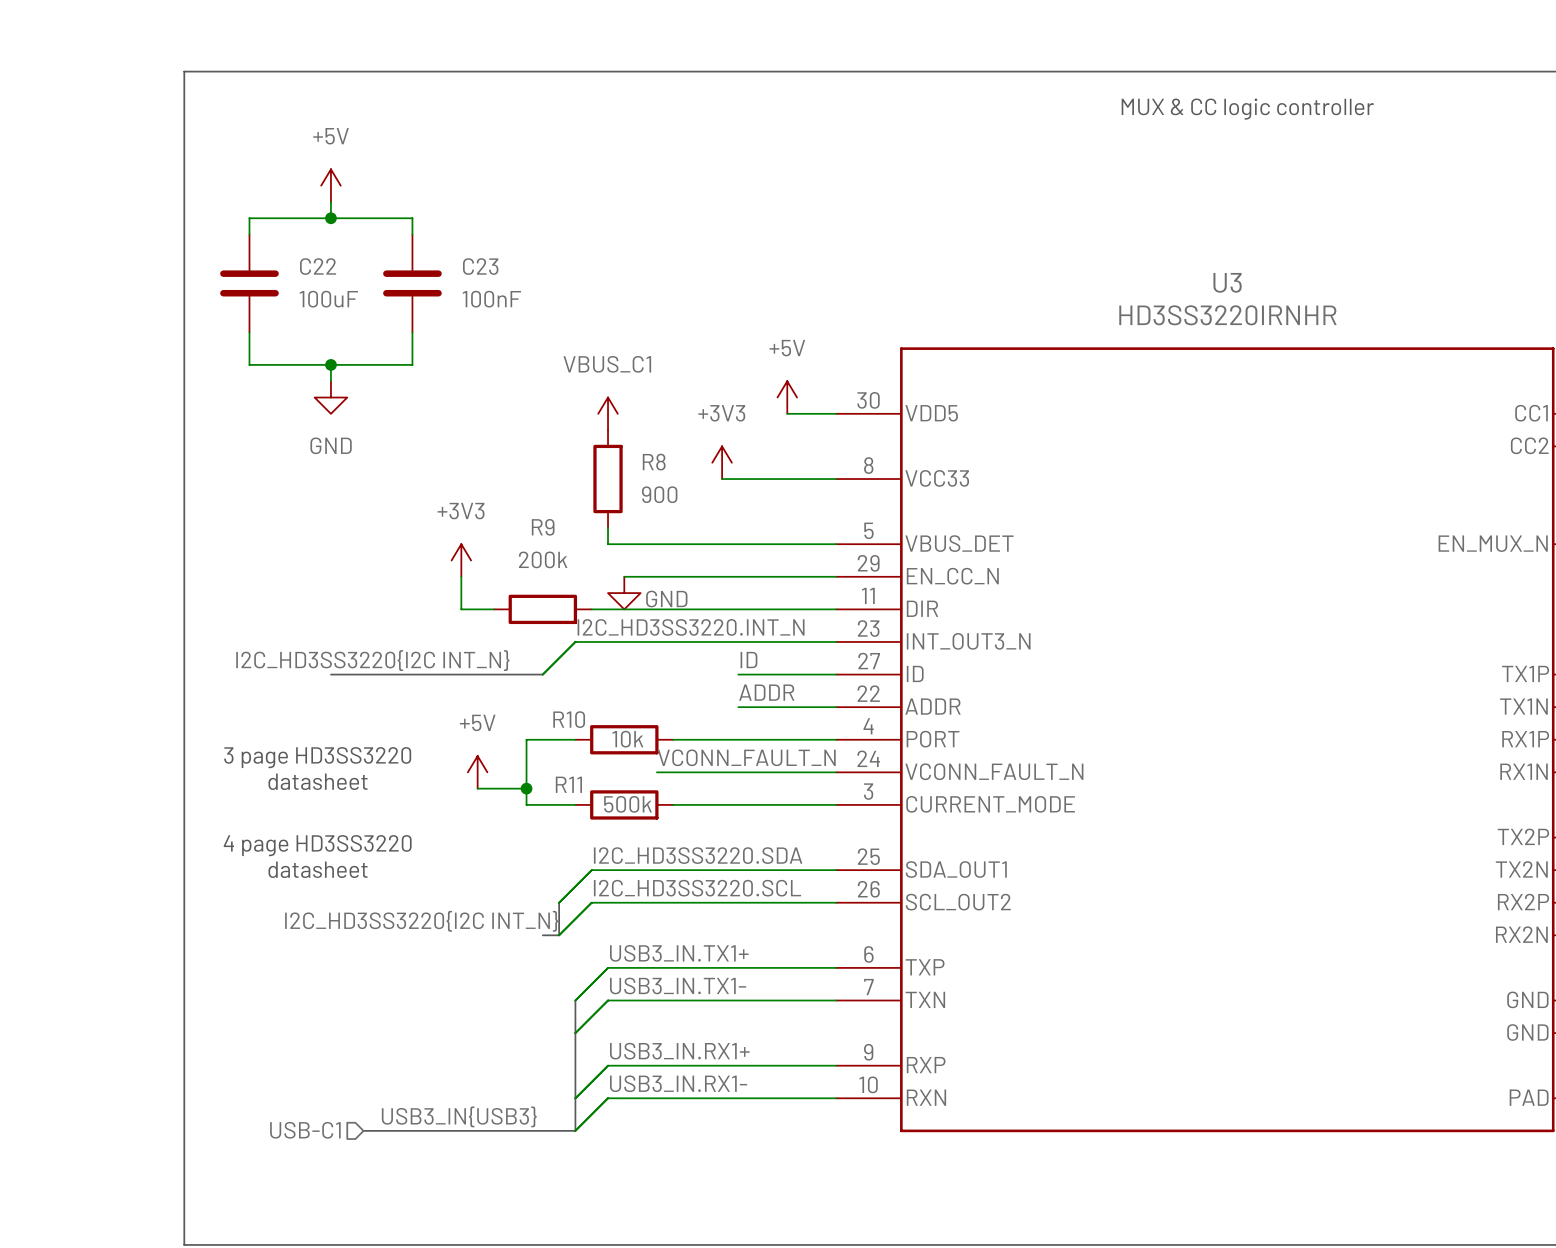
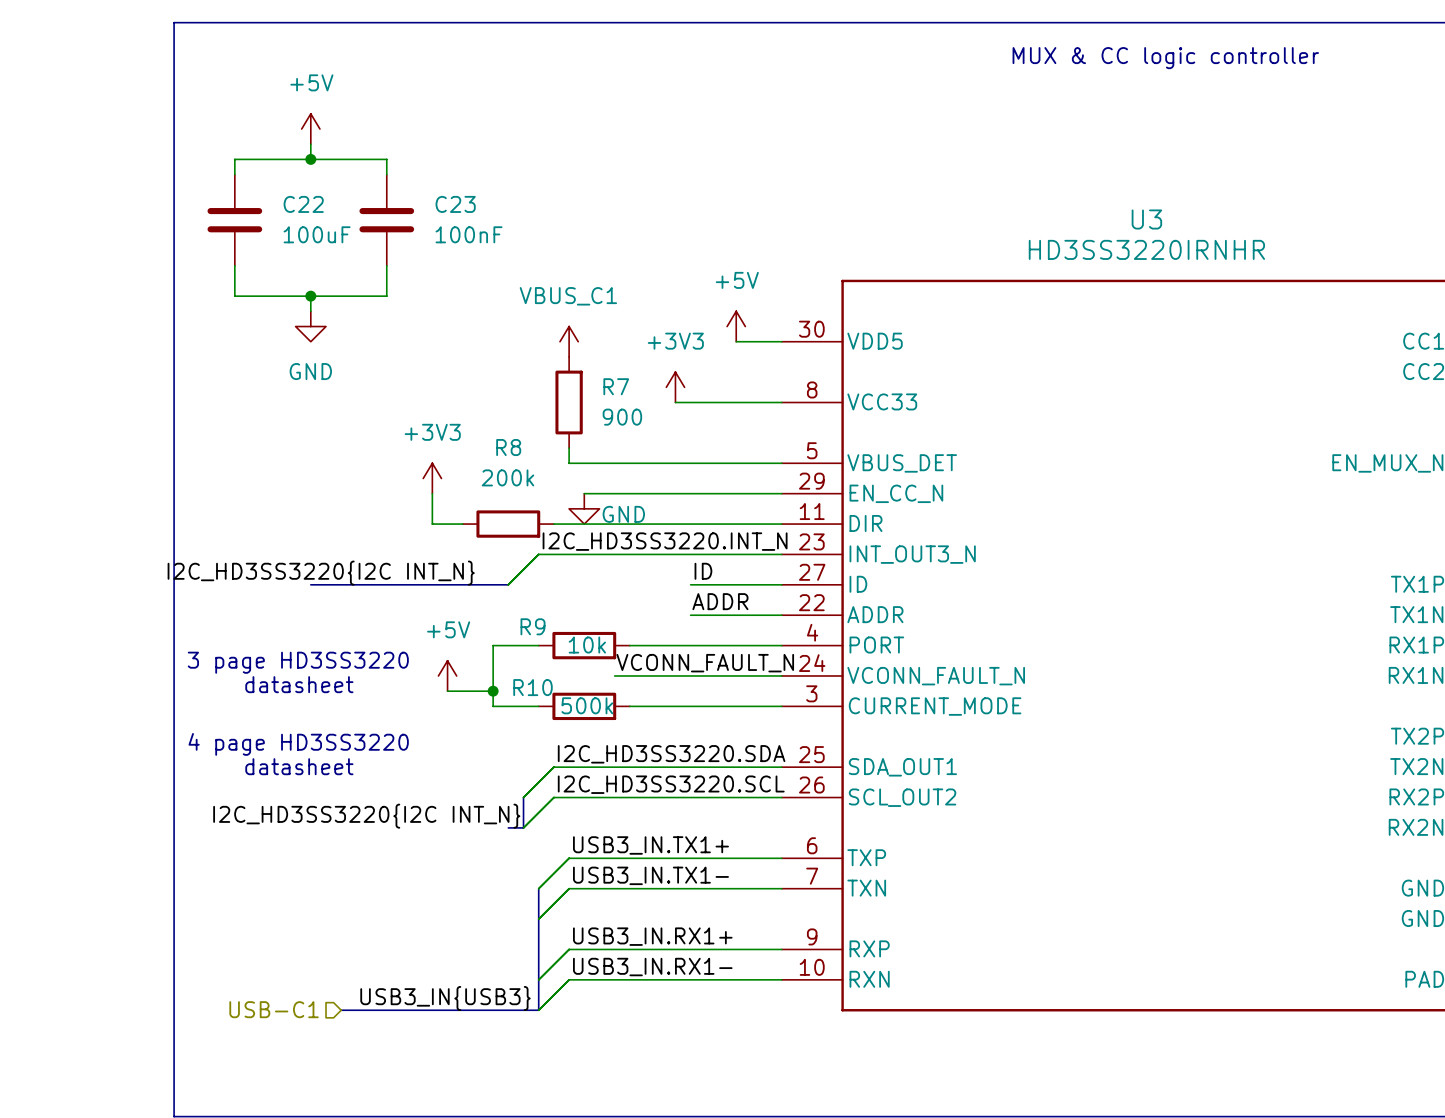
R8 name: R8 (654, 462) -> R7 (616, 386)
R9 name: R9 (543, 527) -> R8 (508, 447)
R10 name: R10 (569, 719) -> R9 (533, 626)
R11 name: R11 (568, 784) -> R10 (533, 687)

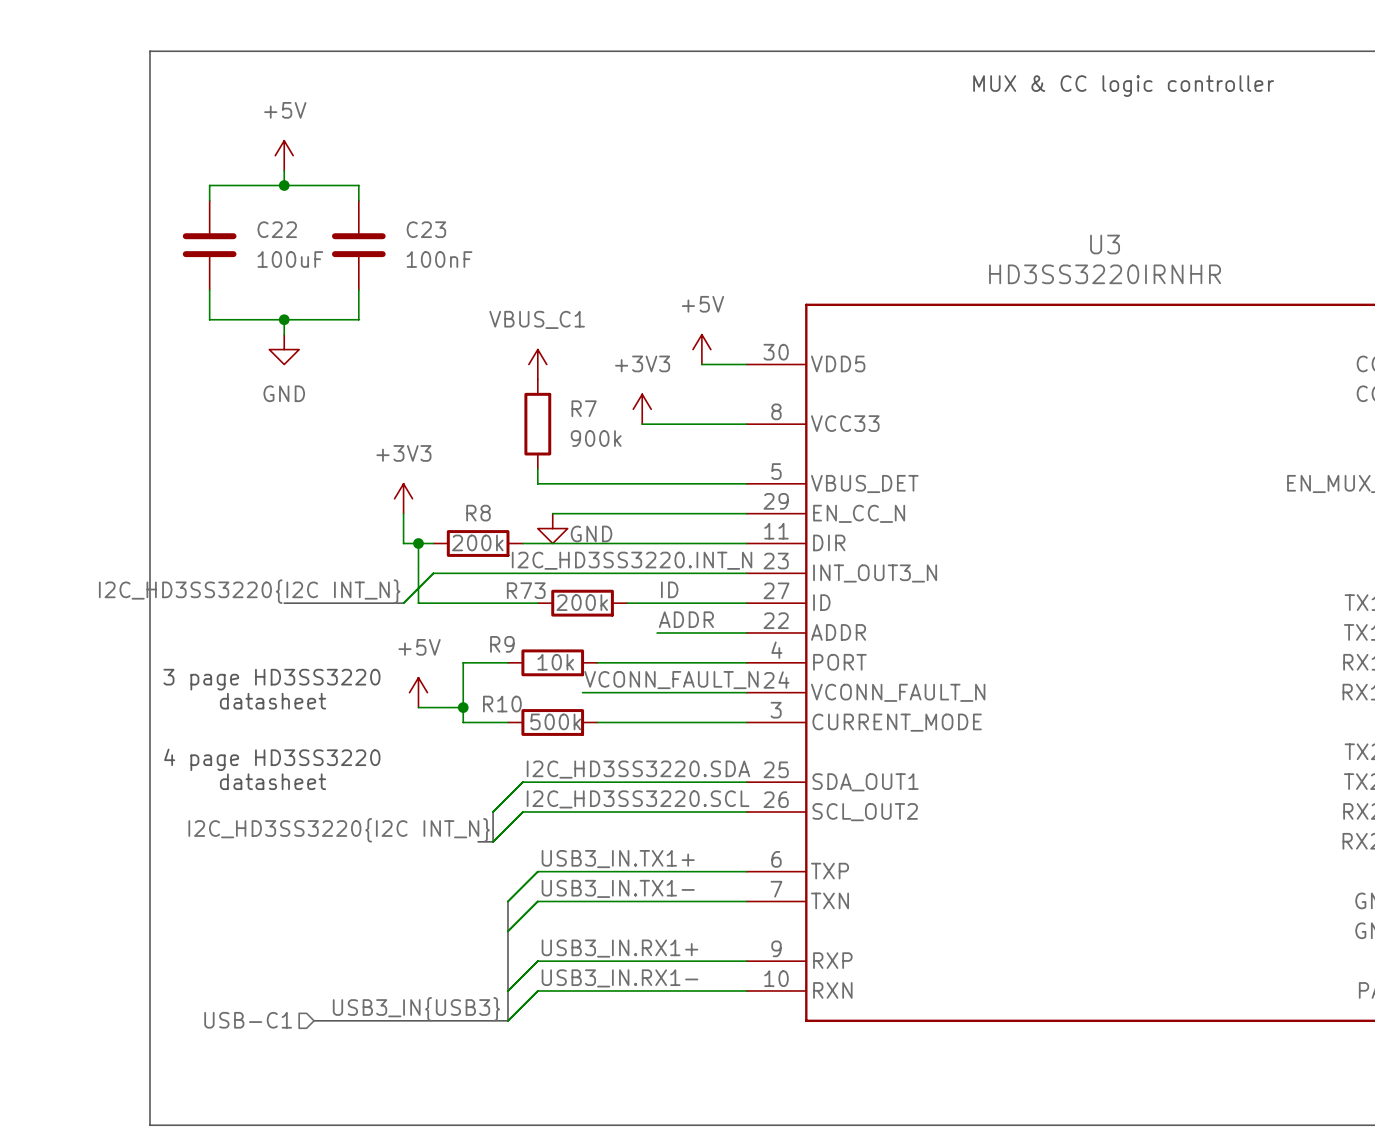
R7 value: 900 (622, 417) -> 900k (596, 438)
R8 name position: R8 (508, 447) -> R8 (478, 513)
R8 value position: 200k (507, 477) -> 200k (477, 542)
wire: none -> (418, 543) (418, 603) (537, 603)
junction: none -> (418, 543)
wire: (538, 554) (508, 584) -> (507, 573) (433, 573) (403, 603)
label position: I2C_HD3SS3220{I2C INT_N} (321, 573) -> I2C_HD3SS3220{I2C INT_N} (249, 591)
bus: (432, 584) (508, 584) -> none
R73: none -> 200k (582, 603)
wire: none -> (627, 603) (657, 603)

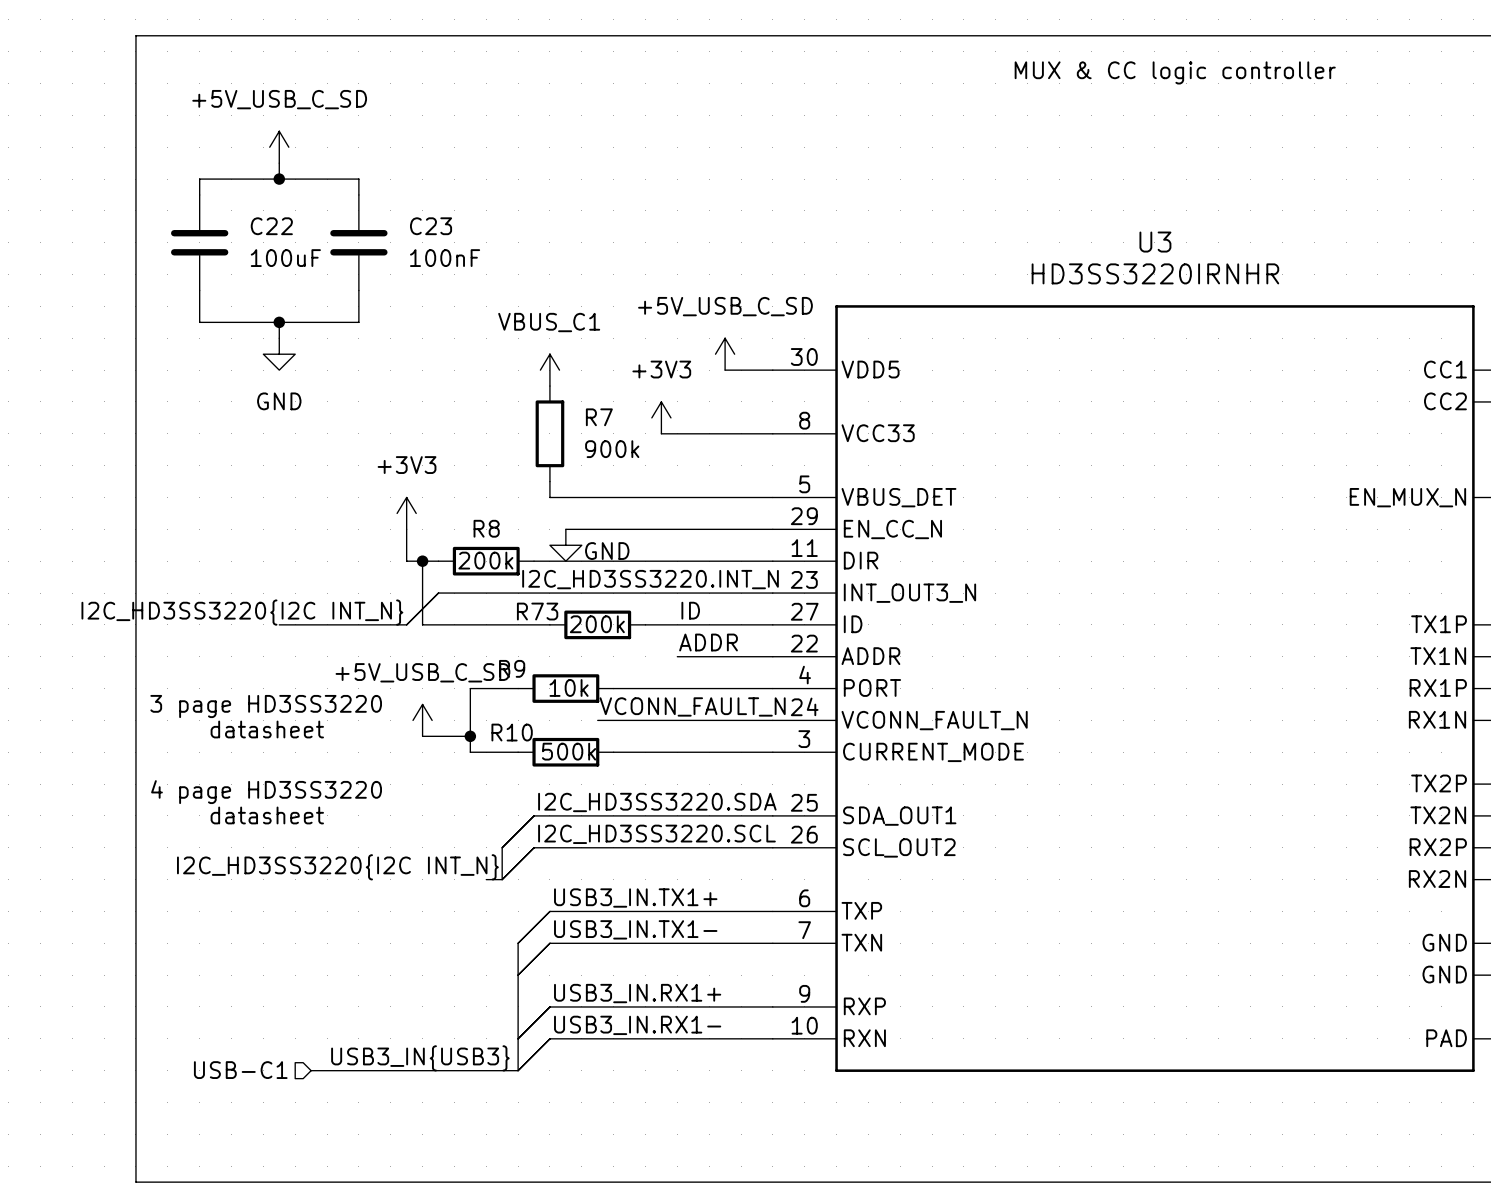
power symbol: +5V (284, 155) -> +5V_USB_C_SD (279, 147)
power symbol: +5V (701, 349) -> +5V_USB_C_SD (725, 354)
power symbol: +5V (418, 692) -> +5V_USB_C_SD (422, 720)

